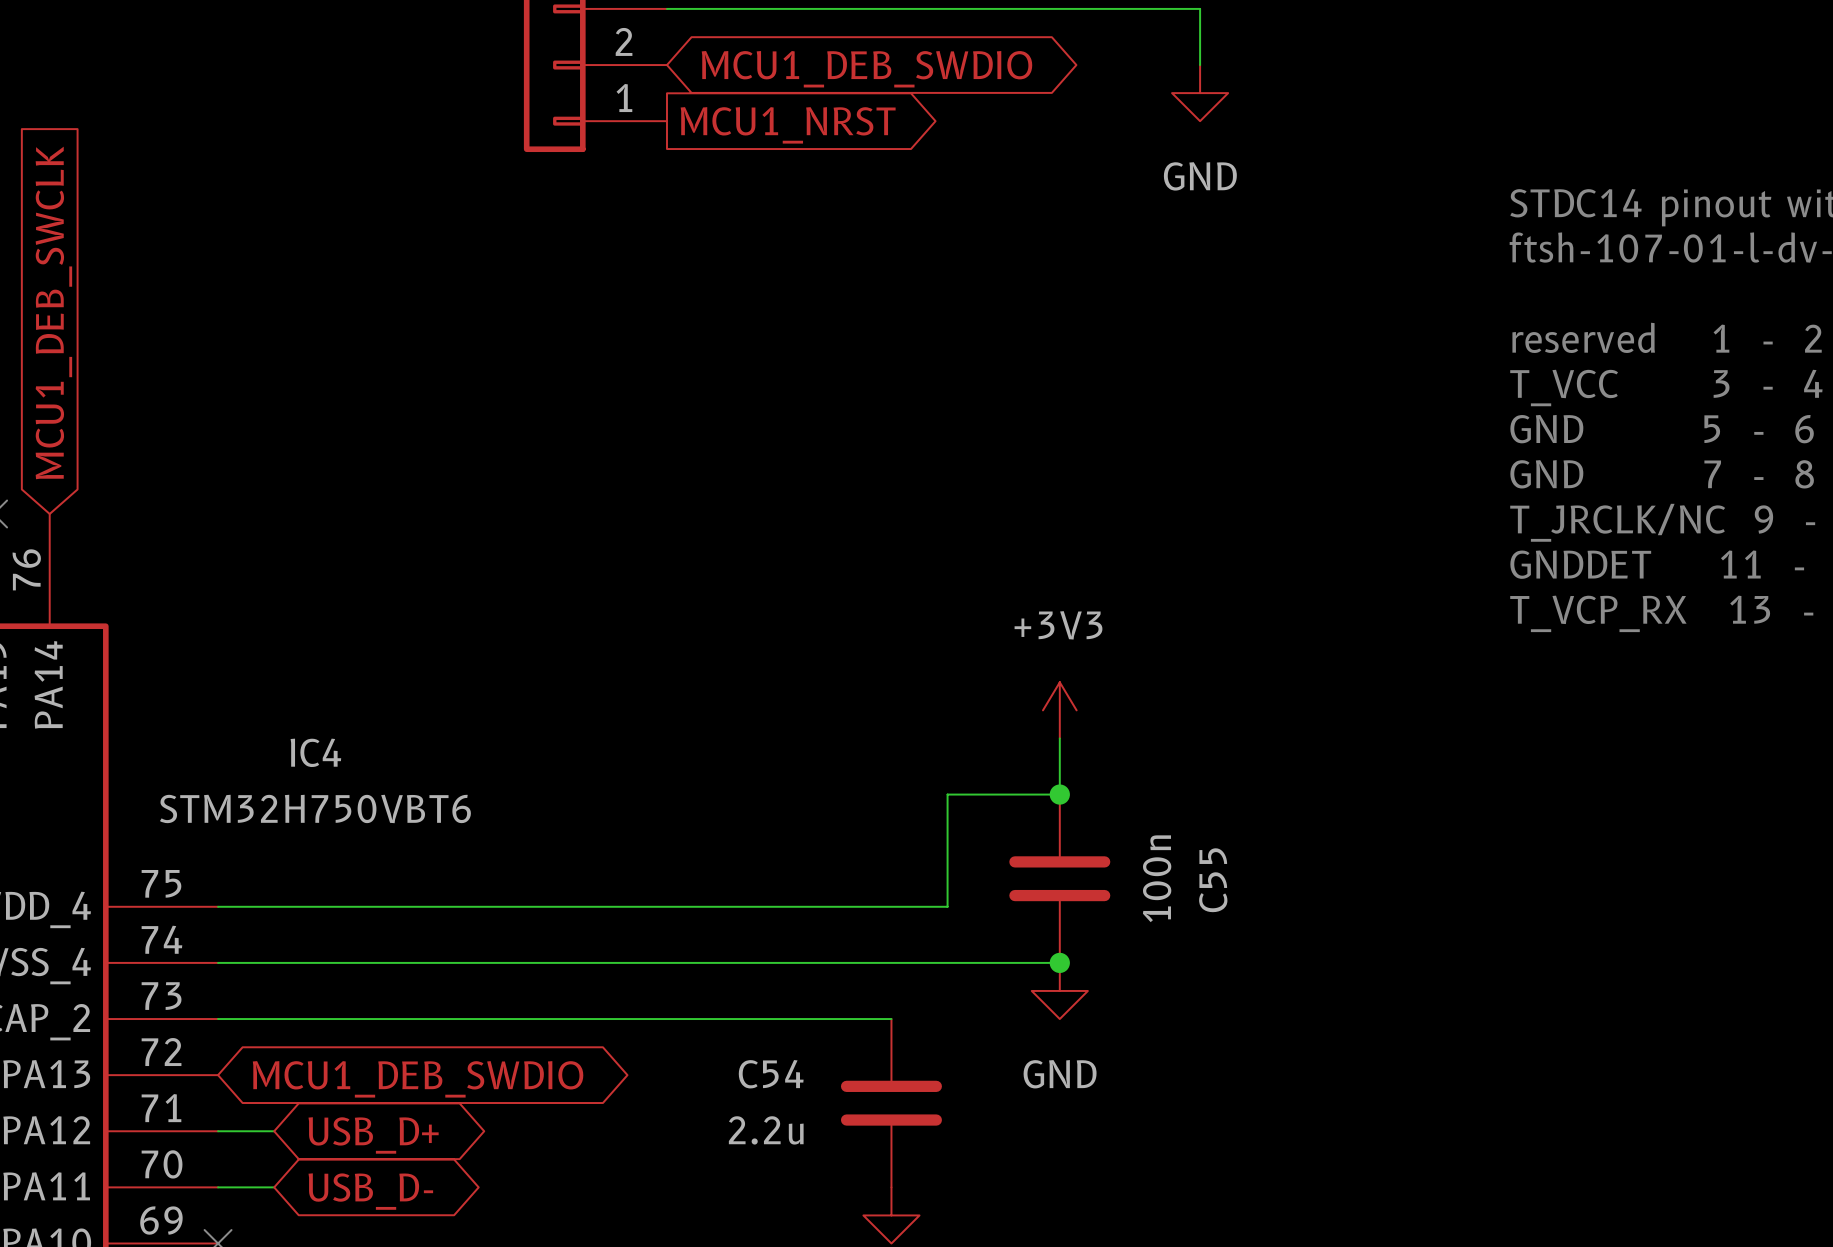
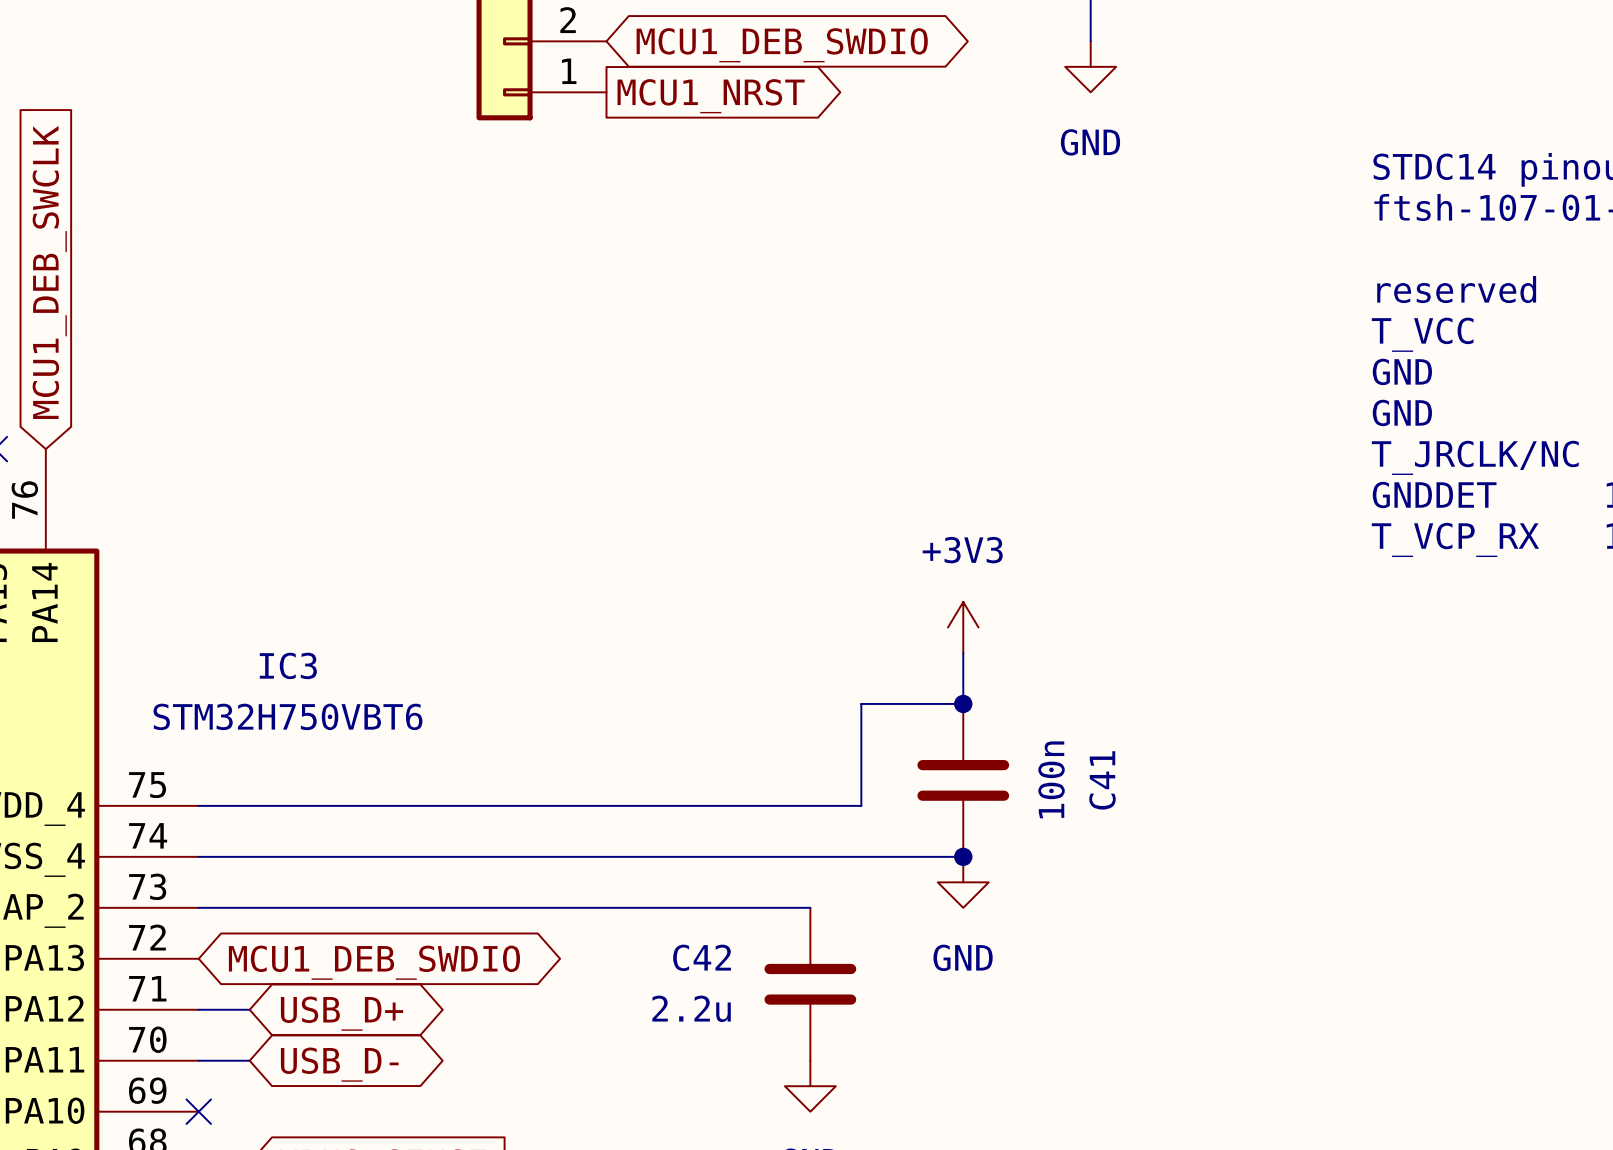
IC4 name: IC4 (315, 752) -> IC3 (288, 665)
C55 name: C55 (1213, 880) -> C41 (1102, 780)
C54 name: C54 (771, 1074) -> C42 (702, 957)

